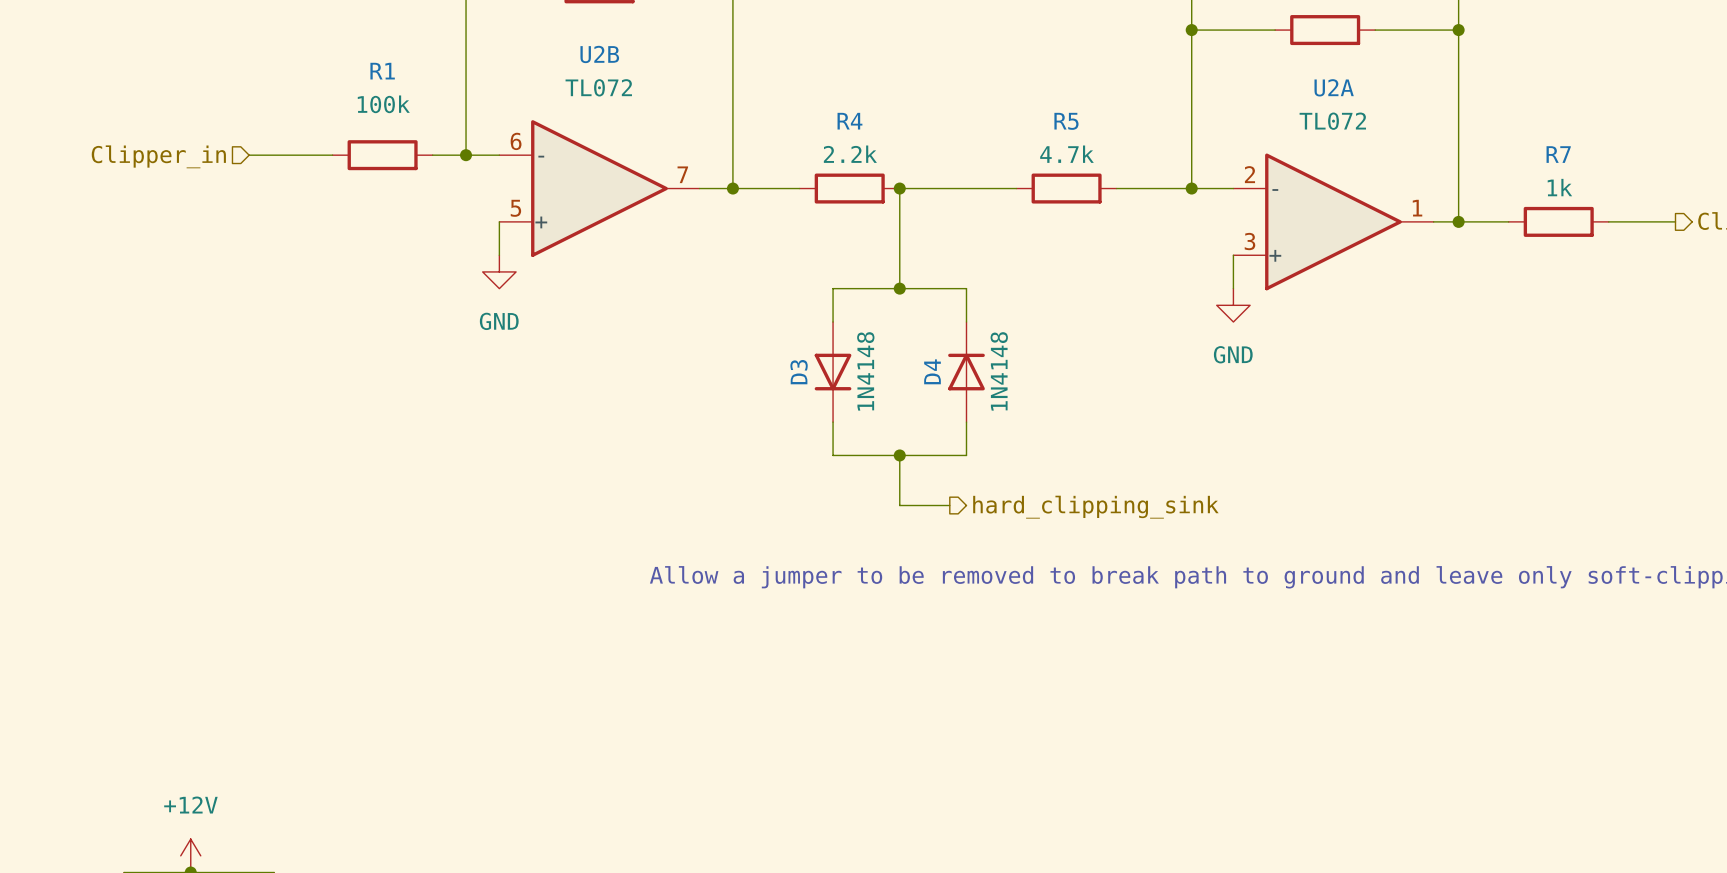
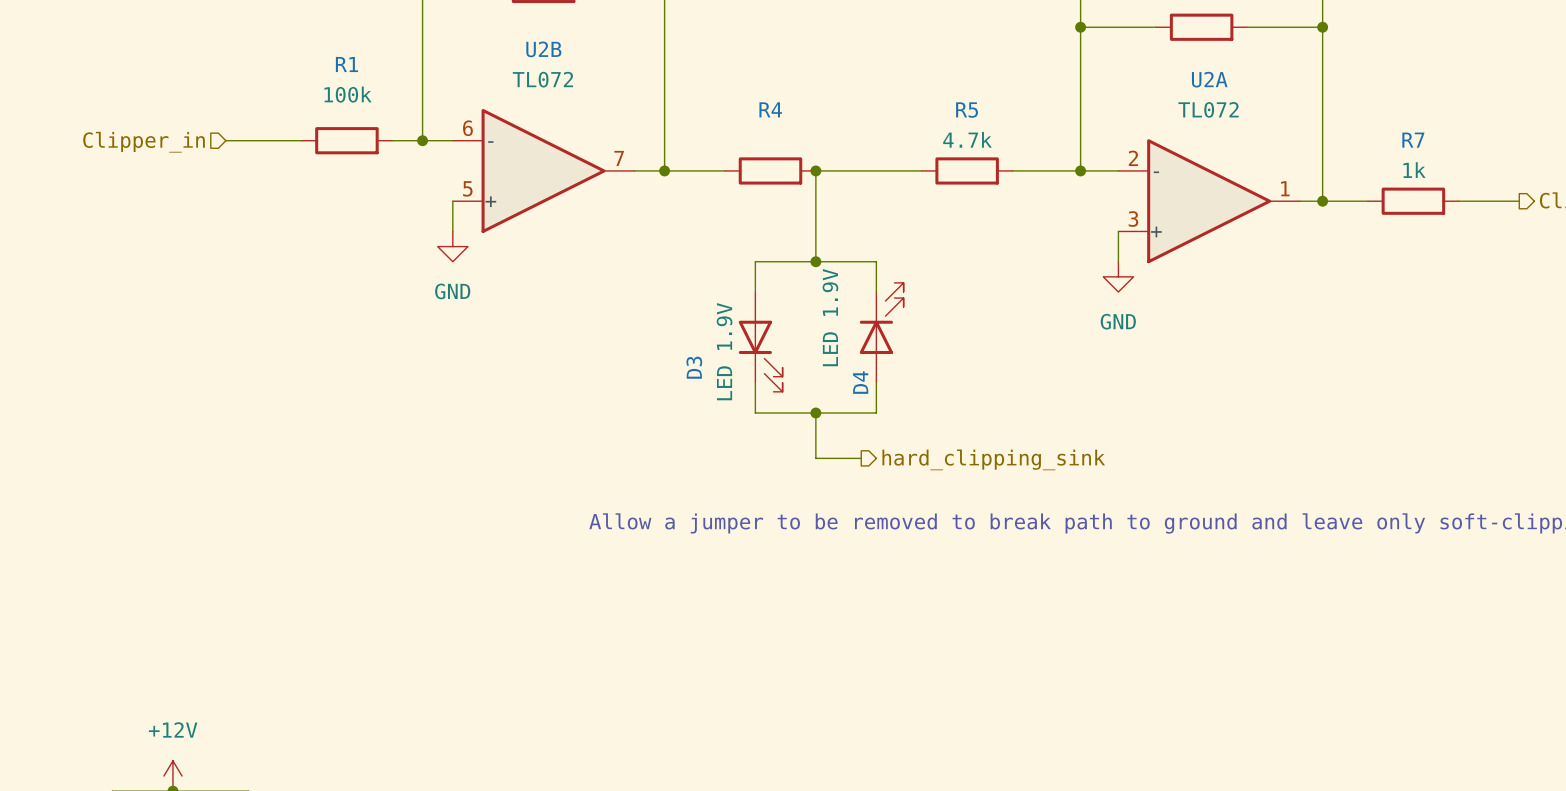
R4 value: 2.2k (850, 154) -> none
D3 symbol: [814, 322, 852, 423] -> [738, 291, 783, 392]
D4 symbol: [948, 322, 985, 423] -> [859, 282, 904, 383]
D3 value: 1N4148 (865, 371) -> LED 1.9V (724, 351)
D4 name position: D4 (932, 371) -> D4 (860, 382)
D4 value: 1N4148 (999, 371) -> LED 1.9V (830, 317)
D3 name position: D3 (799, 372) -> D3 (694, 367)

